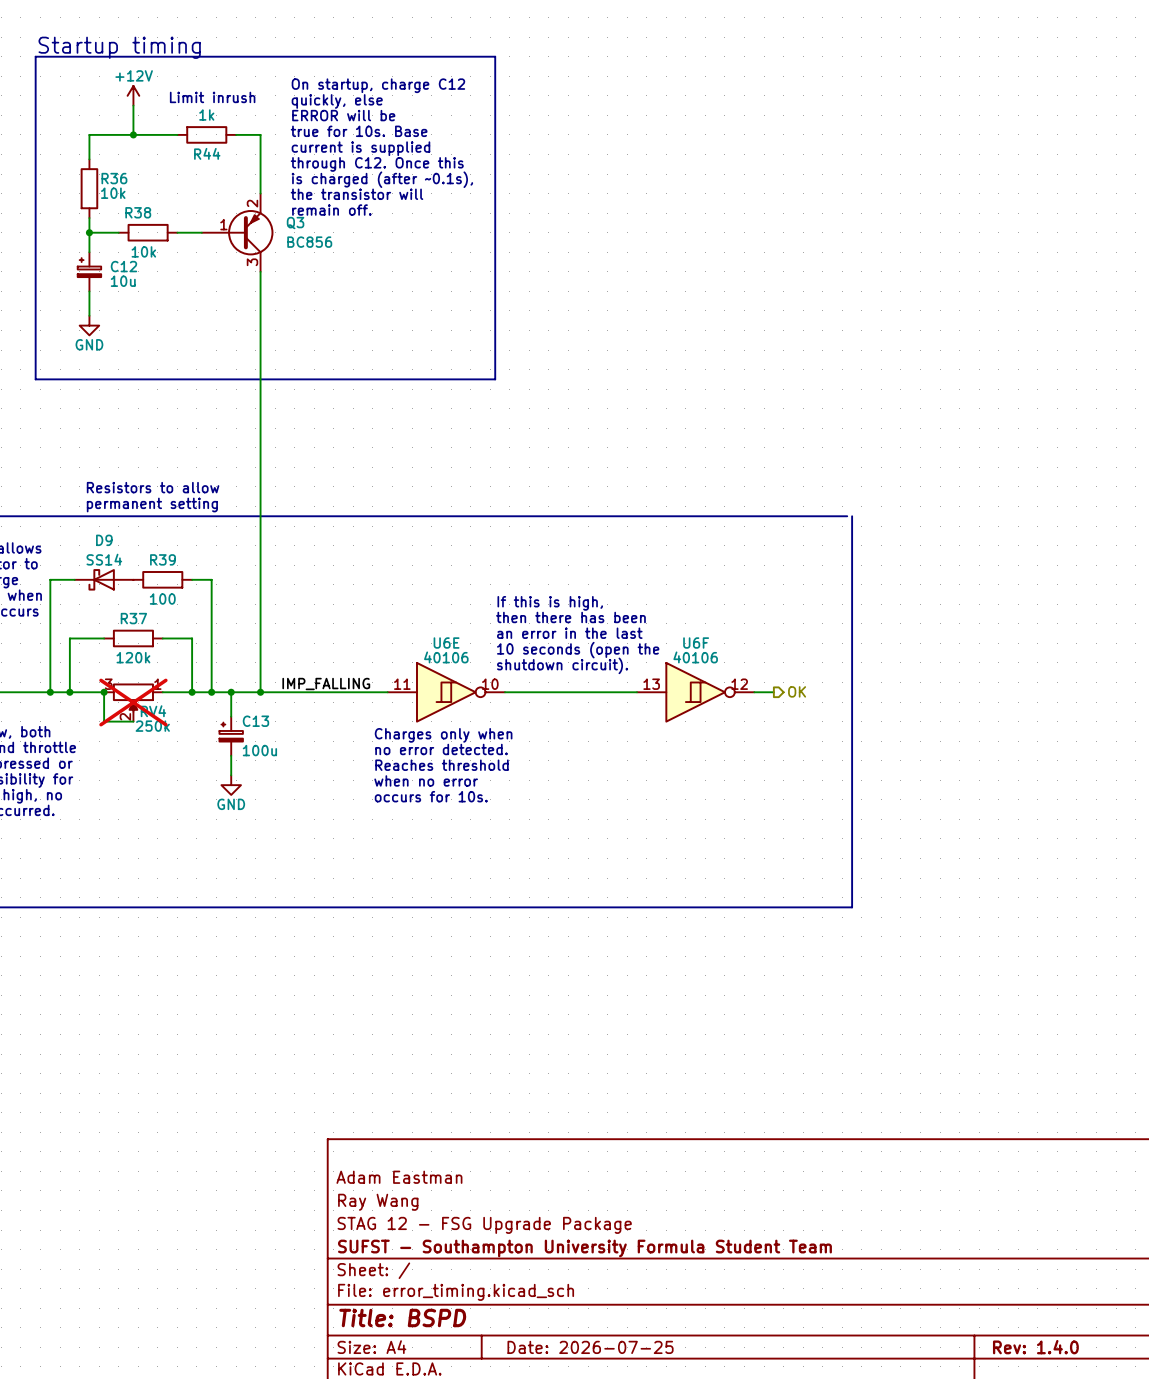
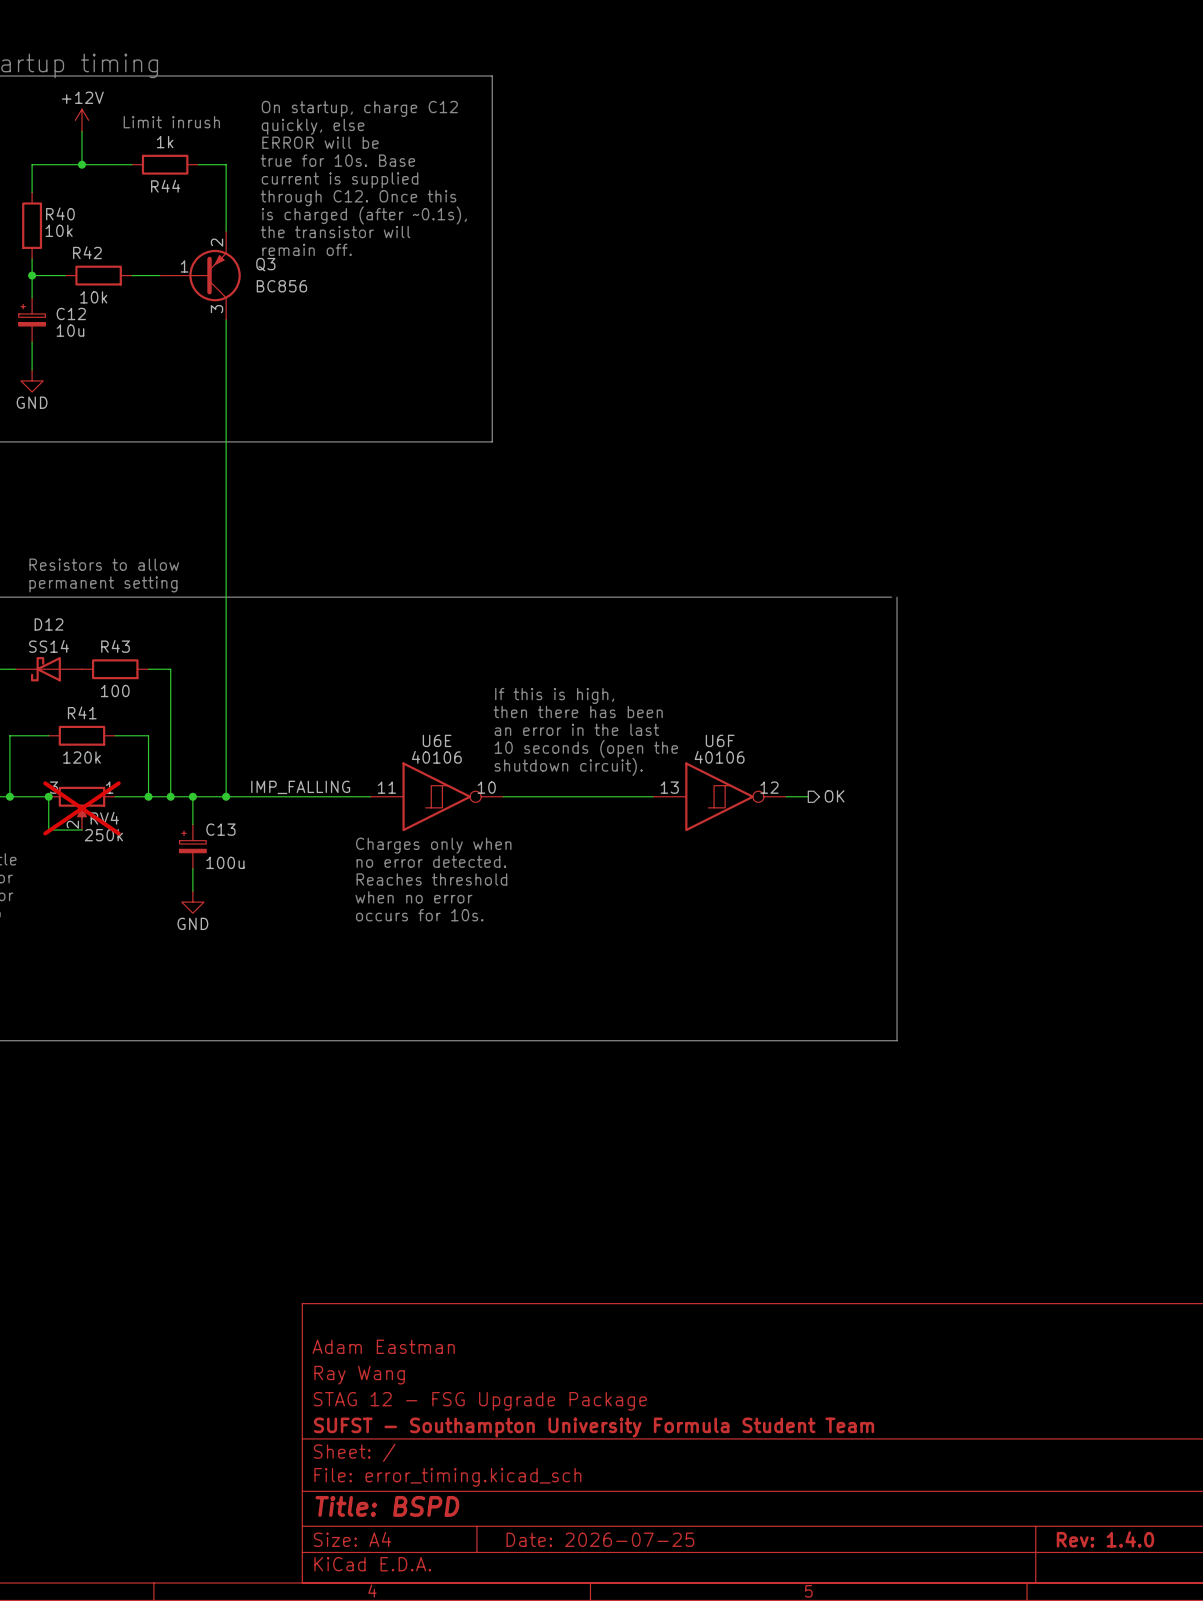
R36 name: R36 (114, 178) -> R40 (60, 213)
R38 name: R38 (138, 212) -> R42 (87, 252)
D9 name: D9 (104, 540) -> D12 (48, 624)
R39 name: R39 (163, 559) -> R43 (115, 646)
R37 name: R37 (133, 618) -> R41 (82, 712)

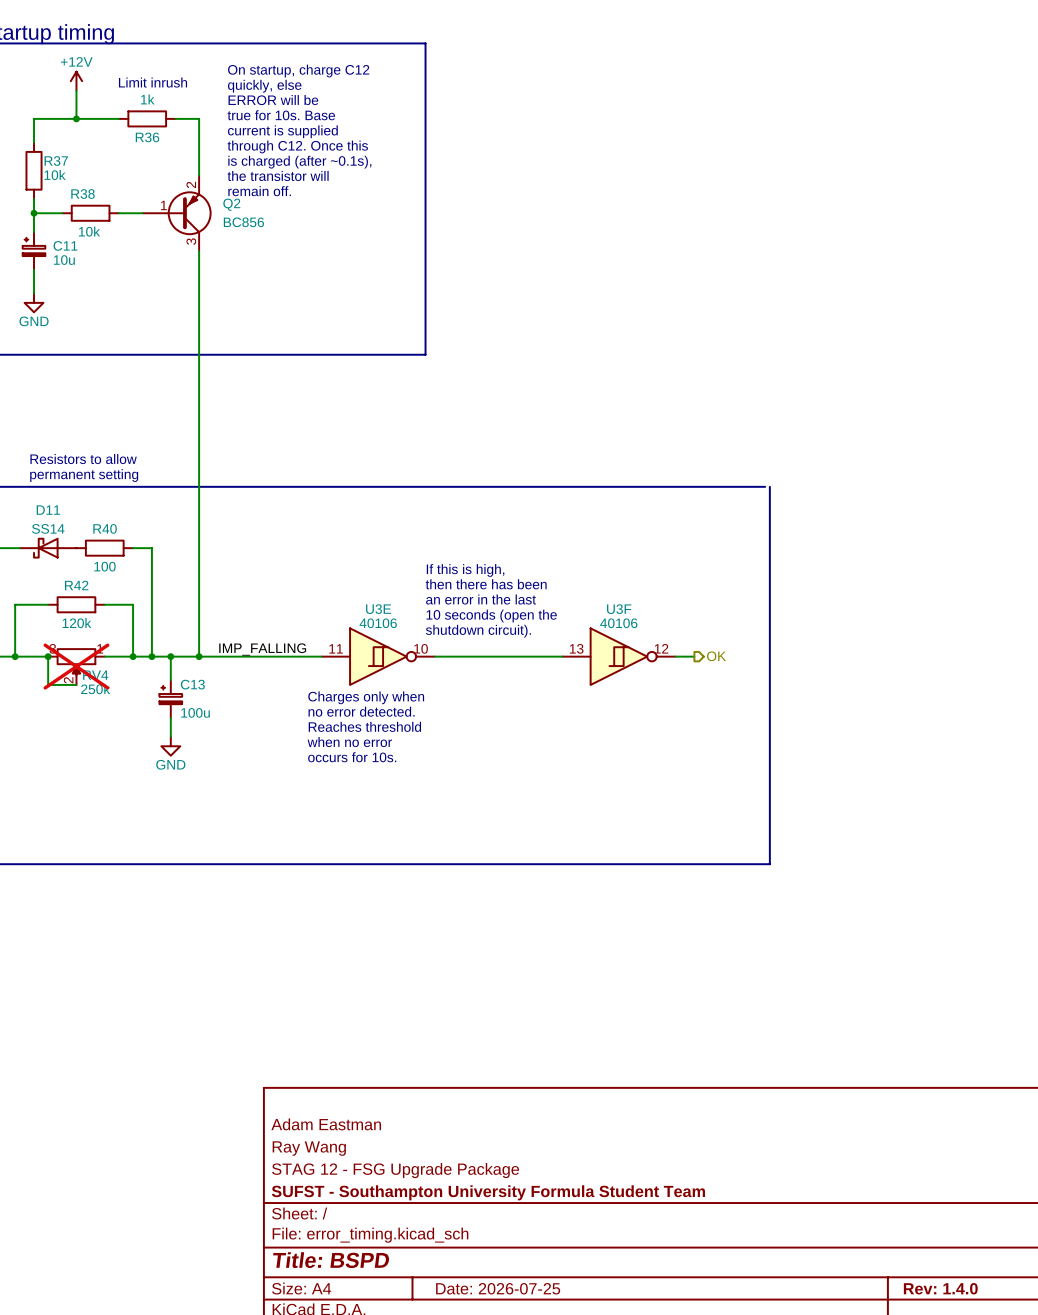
R44 name: R44 (165, 186) -> R36 (147, 137)
R40 name: R40 (60, 213) -> R37 (56, 161)
R42 name: R42 (87, 252) -> R38 (83, 194)
Q3 name: Q3 (265, 264) -> Q2 (231, 204)
C12 name: C12 (71, 313) -> C11 (65, 245)
D12 name: D12 (48, 624) -> D11 (48, 510)
R43 name: R43 (115, 646) -> R40 (105, 528)
R41 name: R41 (82, 712) -> R42 (76, 585)
U6E name: U6E (437, 740) -> U3E (378, 609)
U6F name: U6F (720, 740) -> U3F (619, 609)

